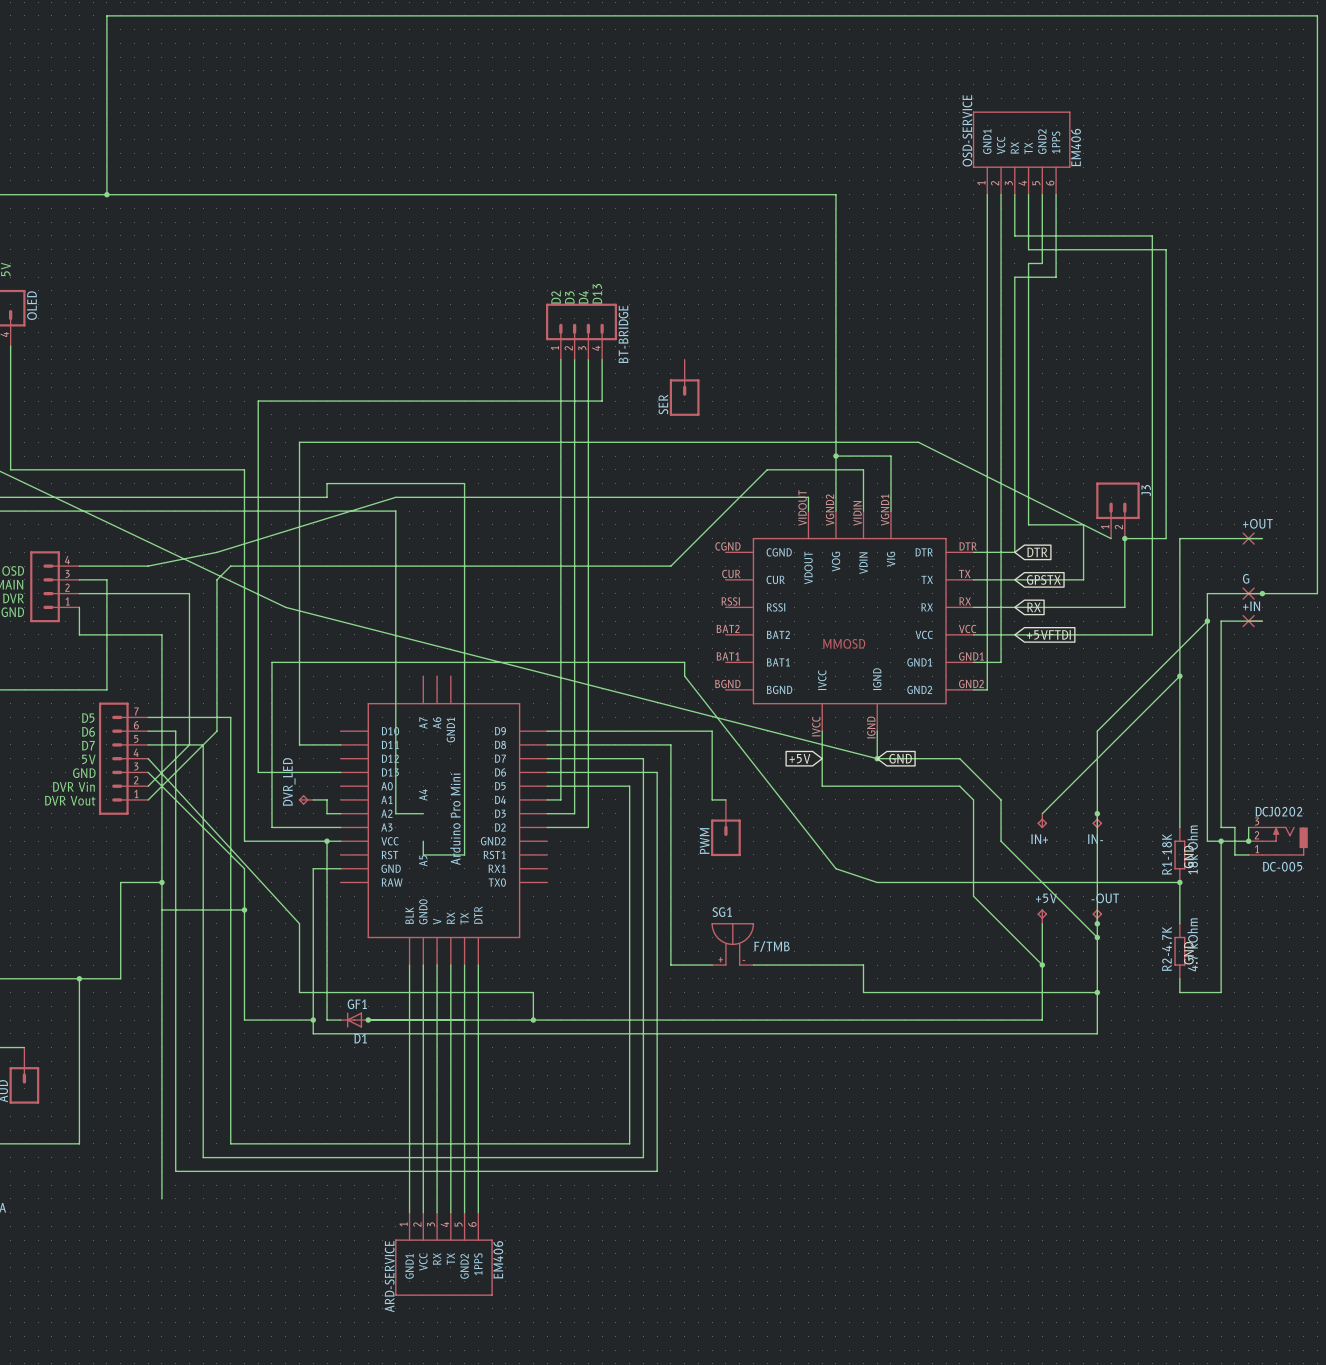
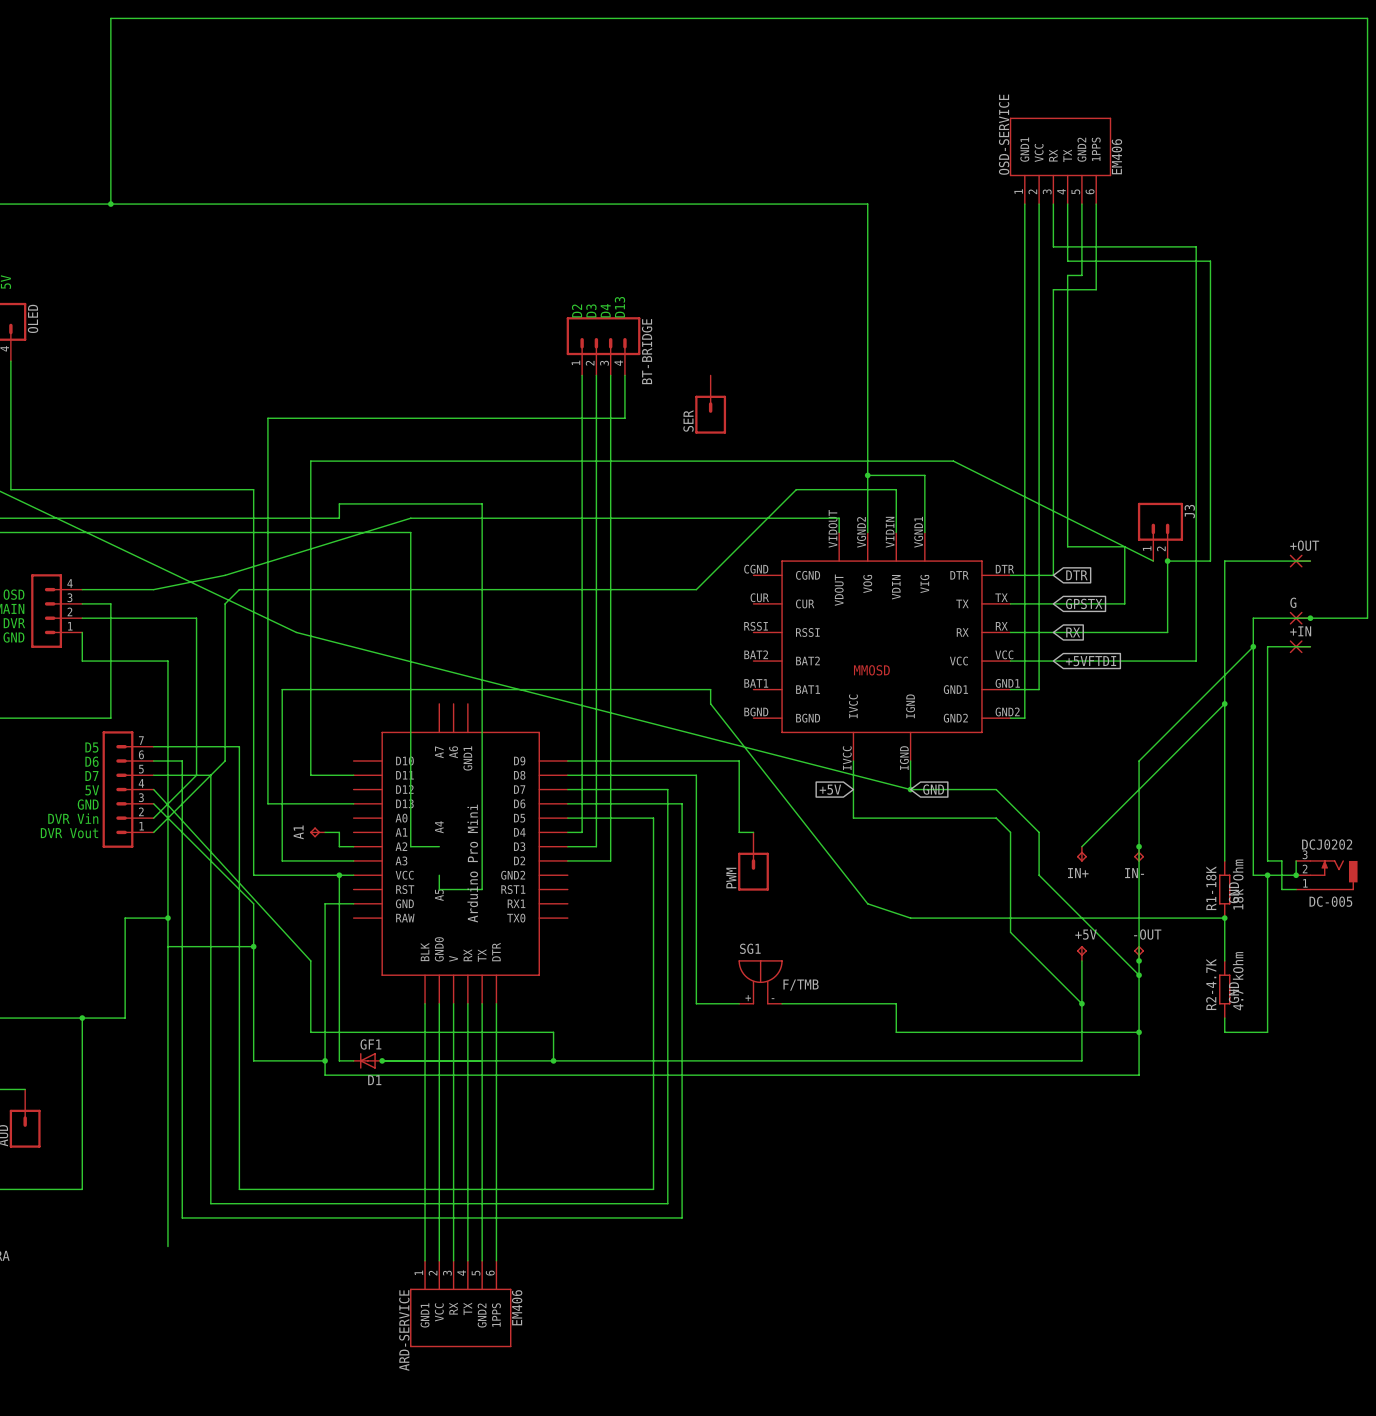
DVR_LED name: DVR_LED (289, 782) -> A1 (298, 832)

